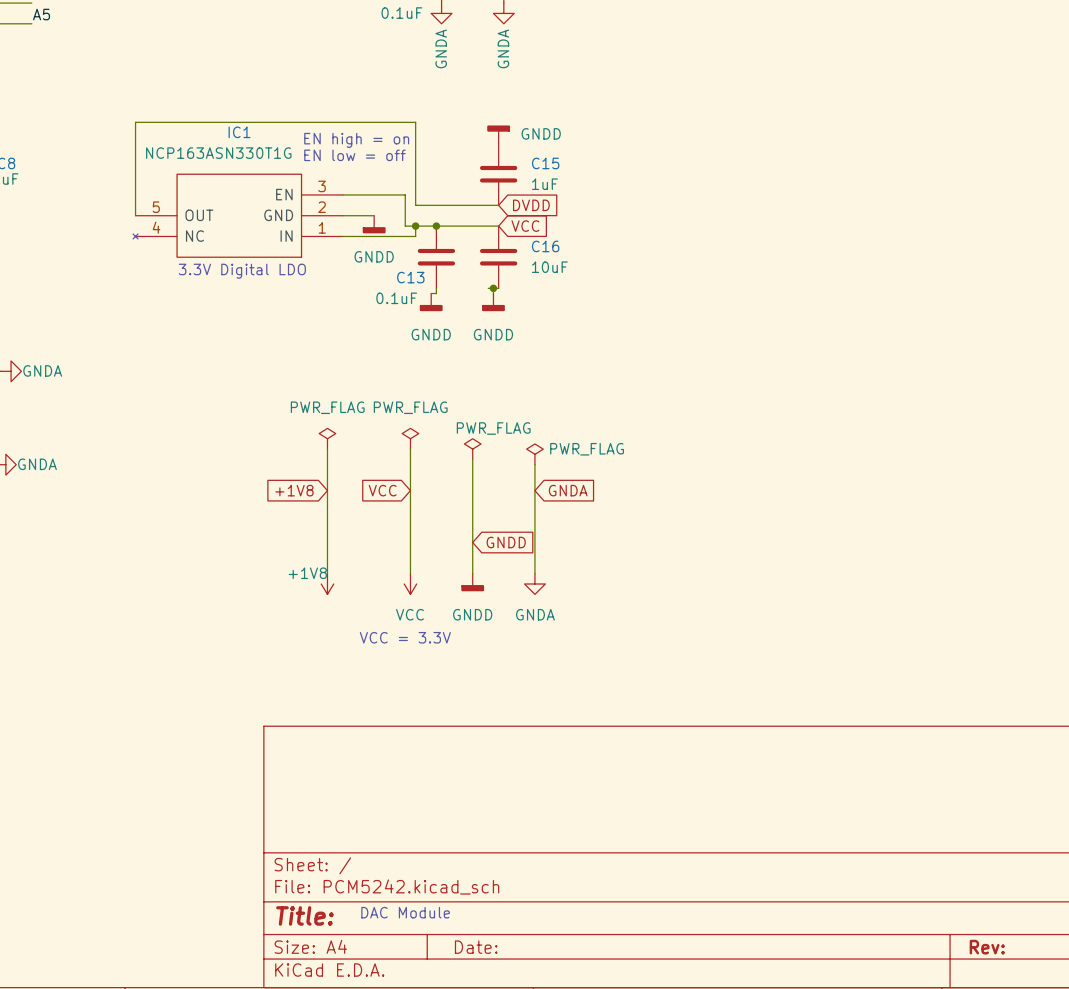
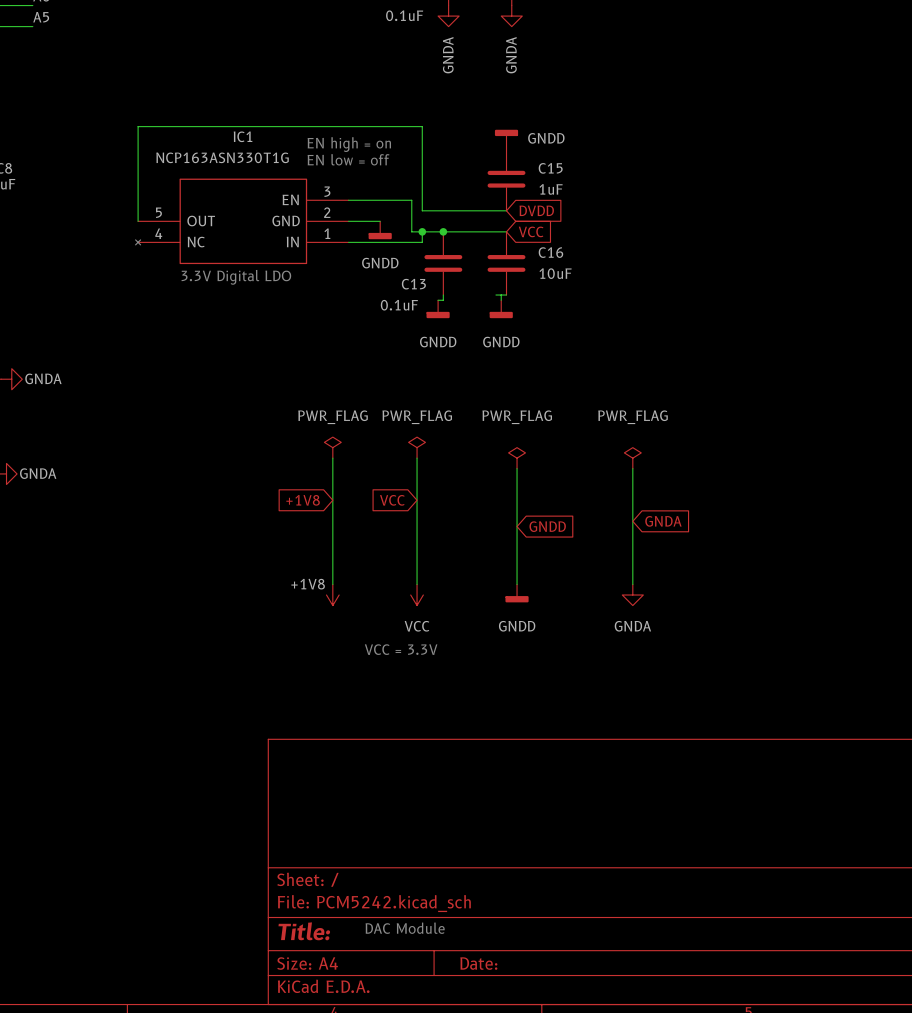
junction: (493, 288) -> none
power symbol: PWR_FLAG (472, 449) -> none
power symbol: none -> PWR_FLAG (517, 458)
power symbol: none -> PWR_FLAG (632, 458)
power symbol: PWR_FLAG (534, 454) -> none
wire: (472, 459) (472, 573) -> (517, 468) (517, 584)
wire: none -> (632, 468) (632, 584)
wire: (534, 464) (534, 573) -> none
global label position: GNDA (568, 490) -> GNDA (663, 521)
global label position: GNDD (506, 542) -> GNDD (547, 526)
power symbol position: GNDD (472, 582) -> GNDD (517, 593)
power symbol position: GNDA (534, 584) -> GNDA (632, 595)

